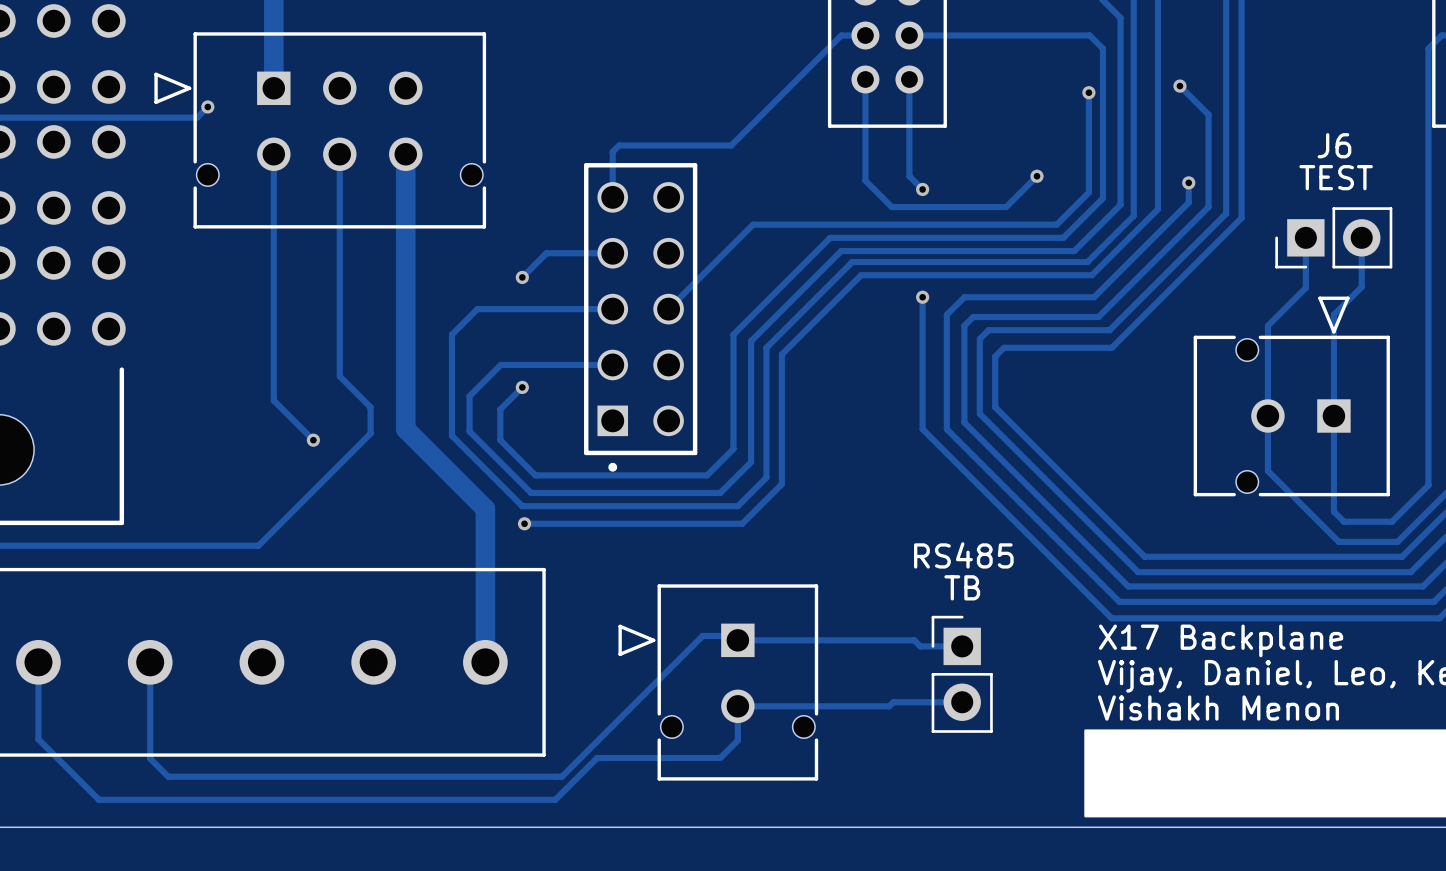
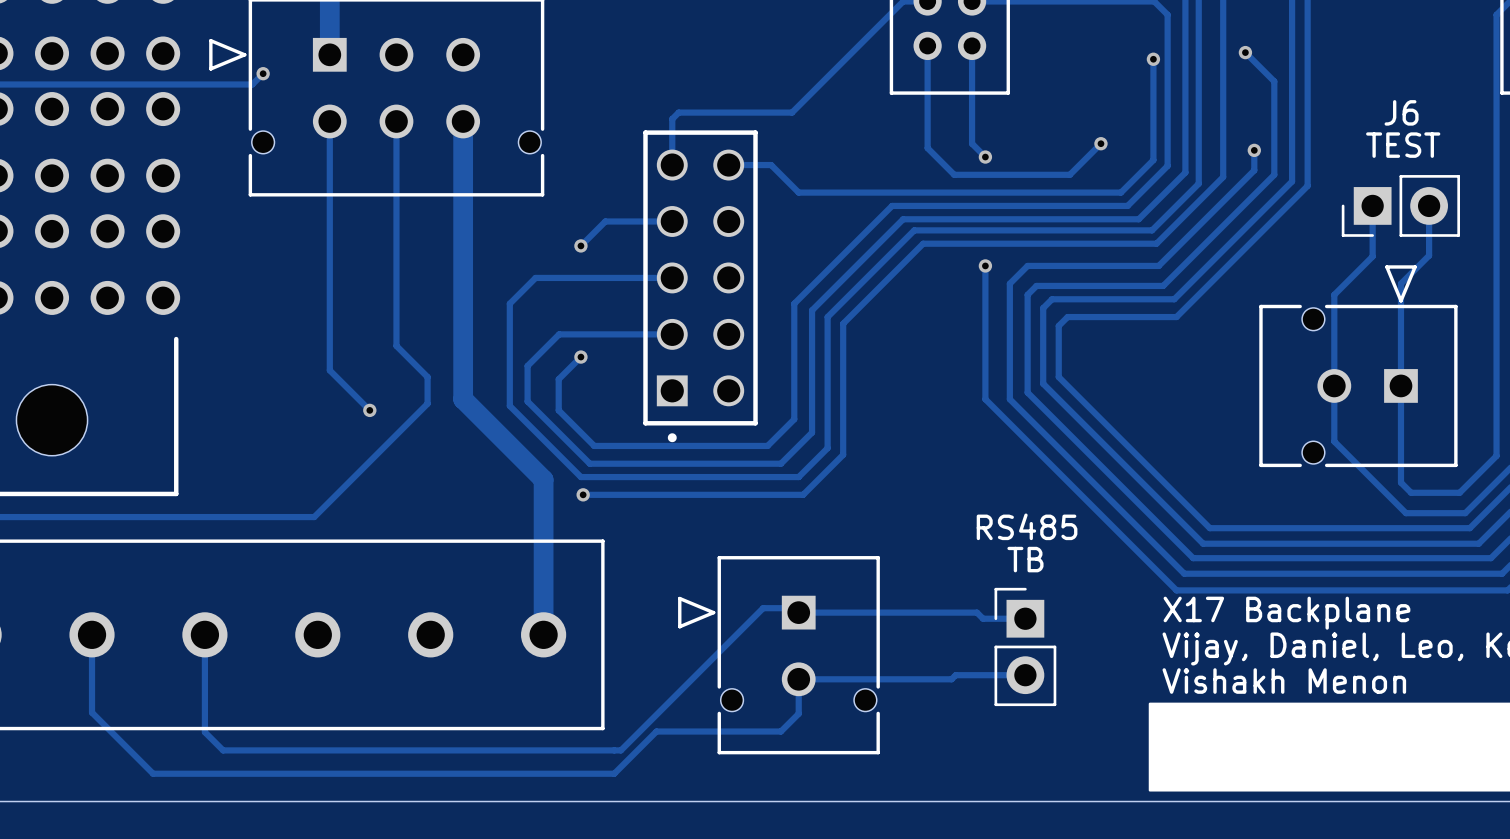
track: (753, 224) (668, 309) -> (814, 192) (798, 192) (771, 165) (728, 165)

